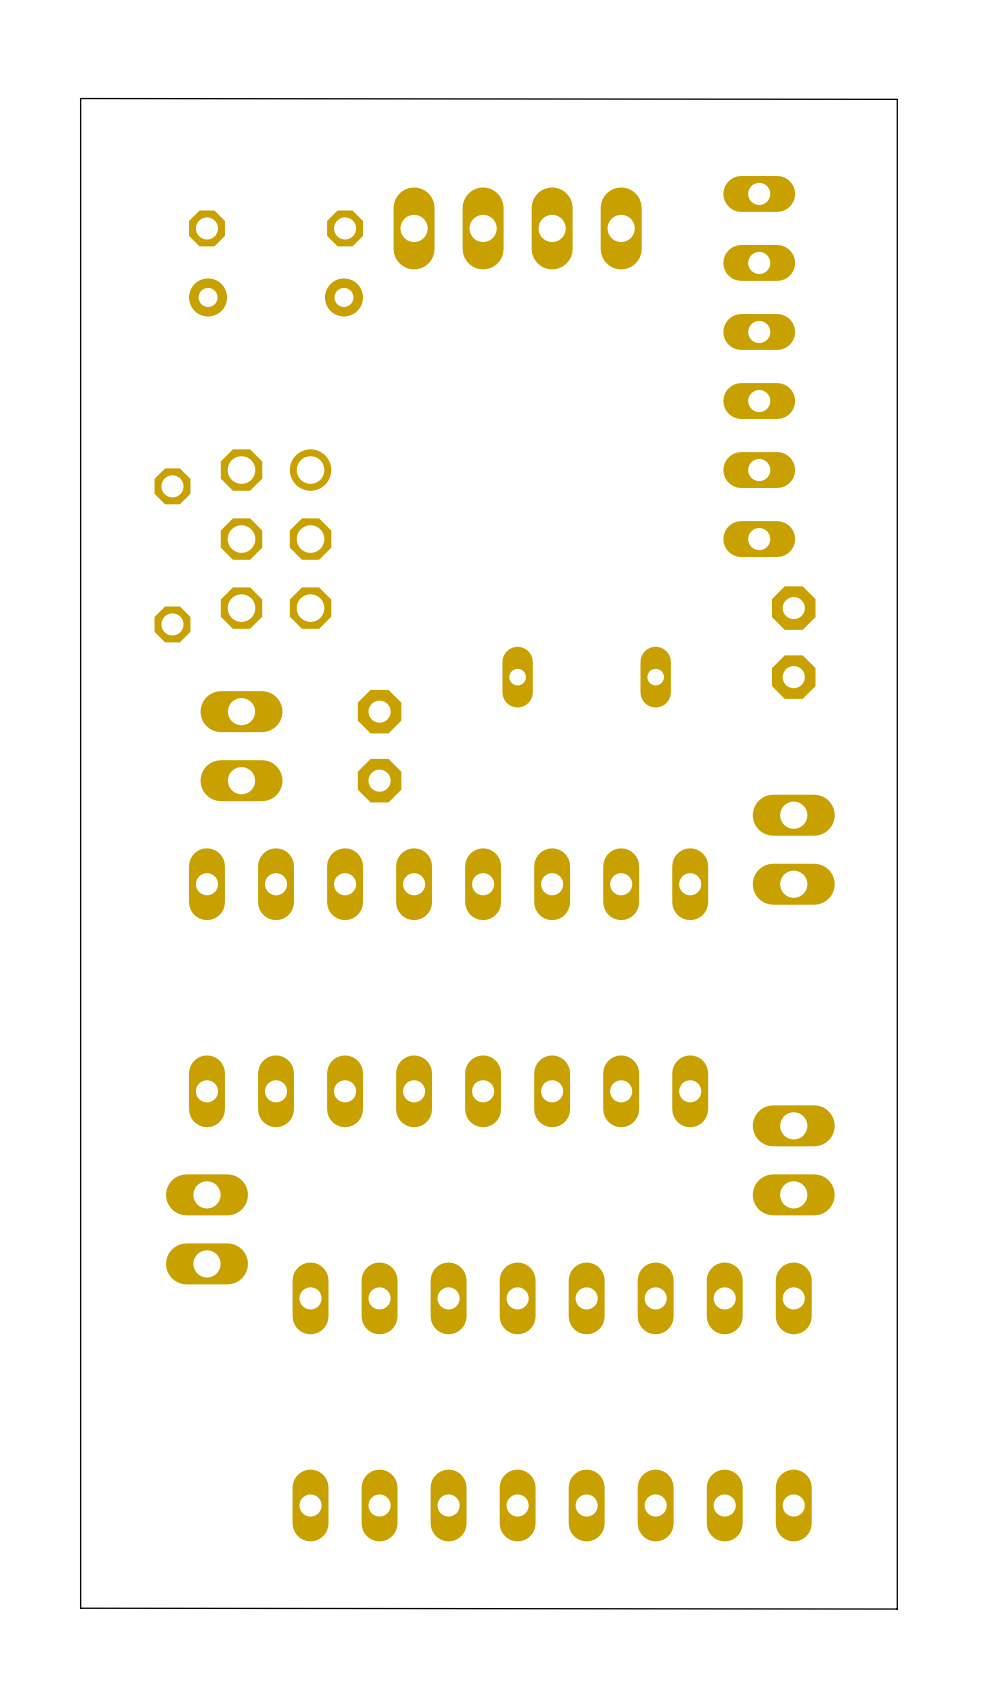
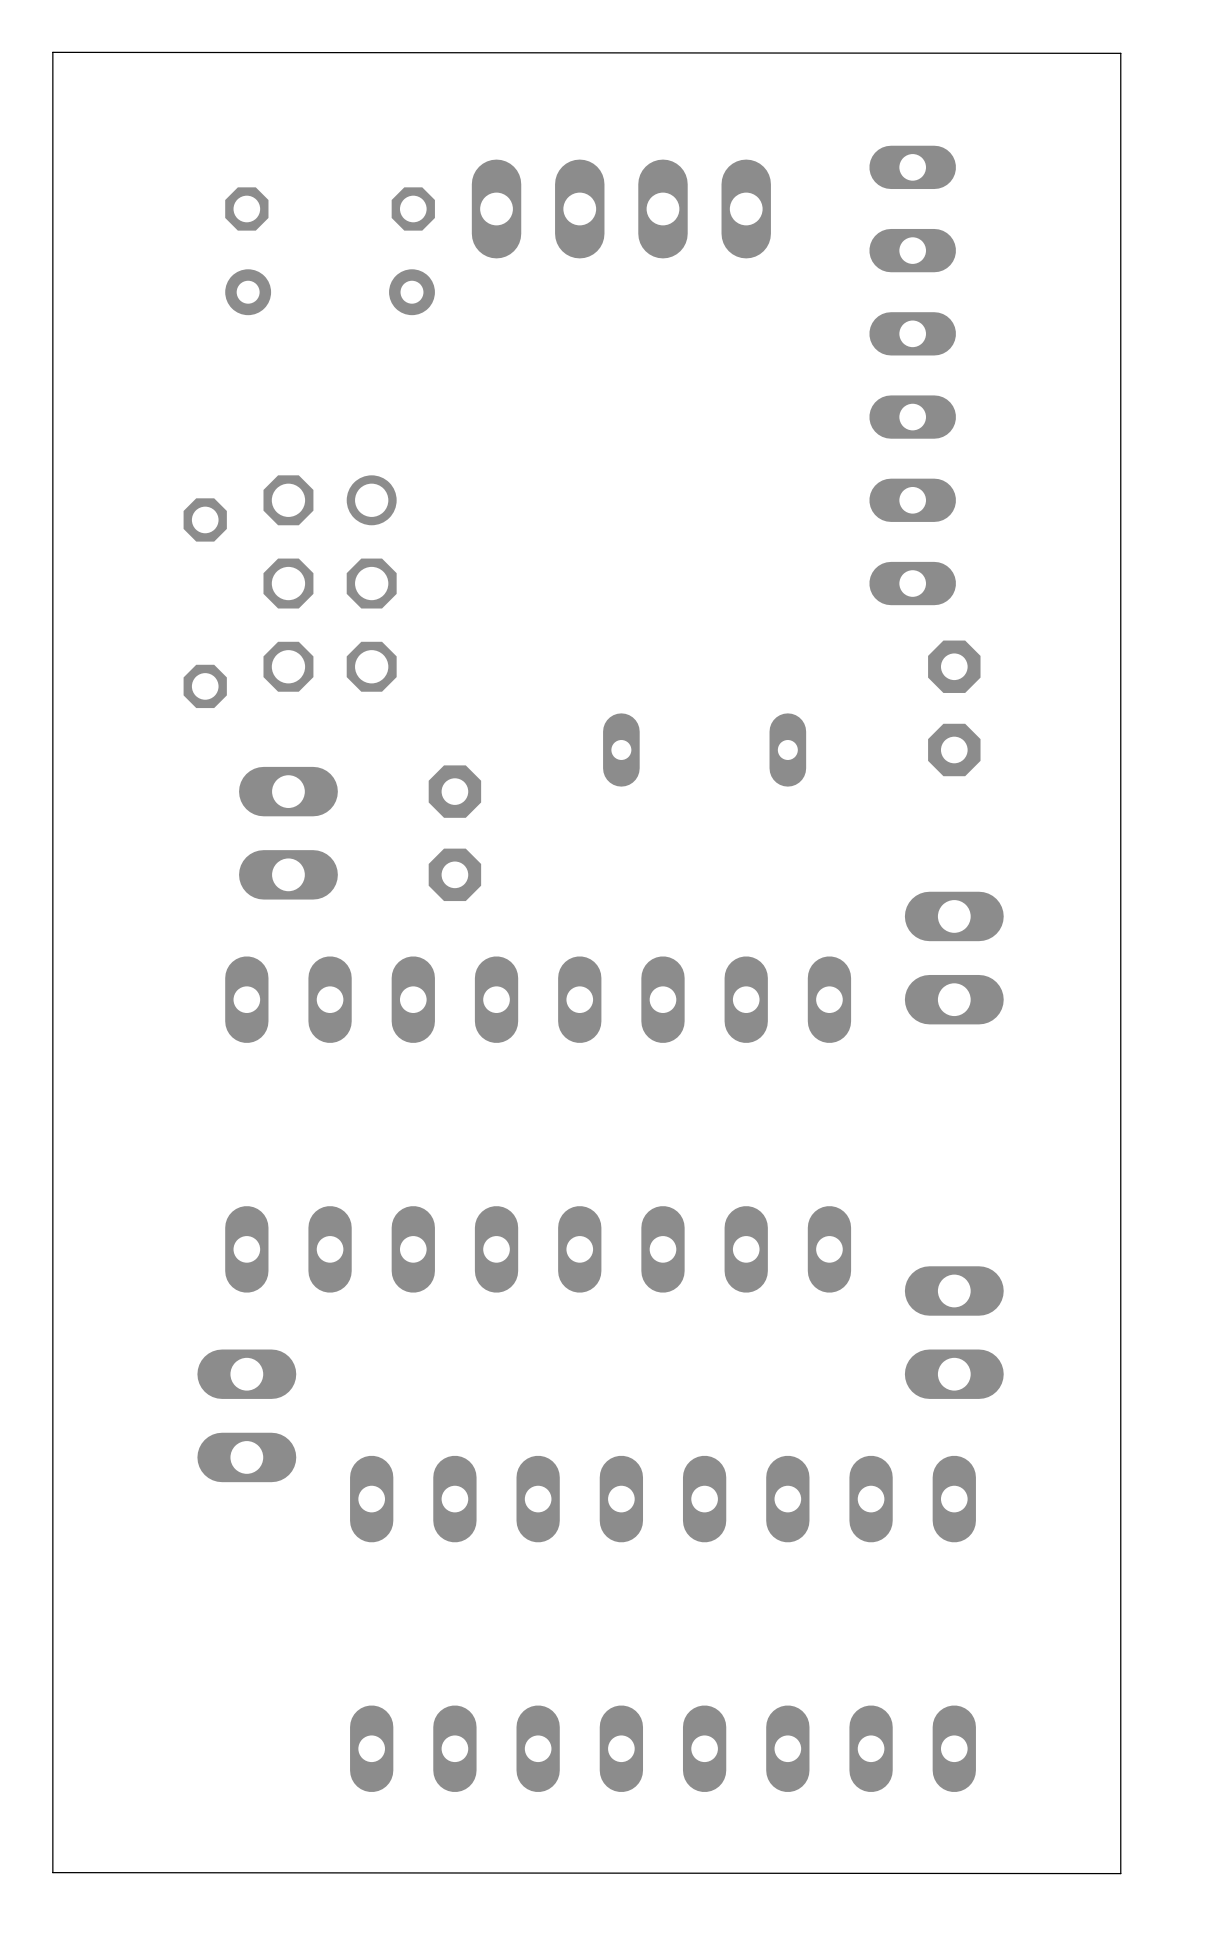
board edge: (80, 98) (80, 1608) -> (94, 52) (52, 52) (52, 1872) (94, 1872)
board edge: (897, 99) (897, 1609) -> (1079, 53) (1120, 53) (1120, 1873) (1079, 1873)

